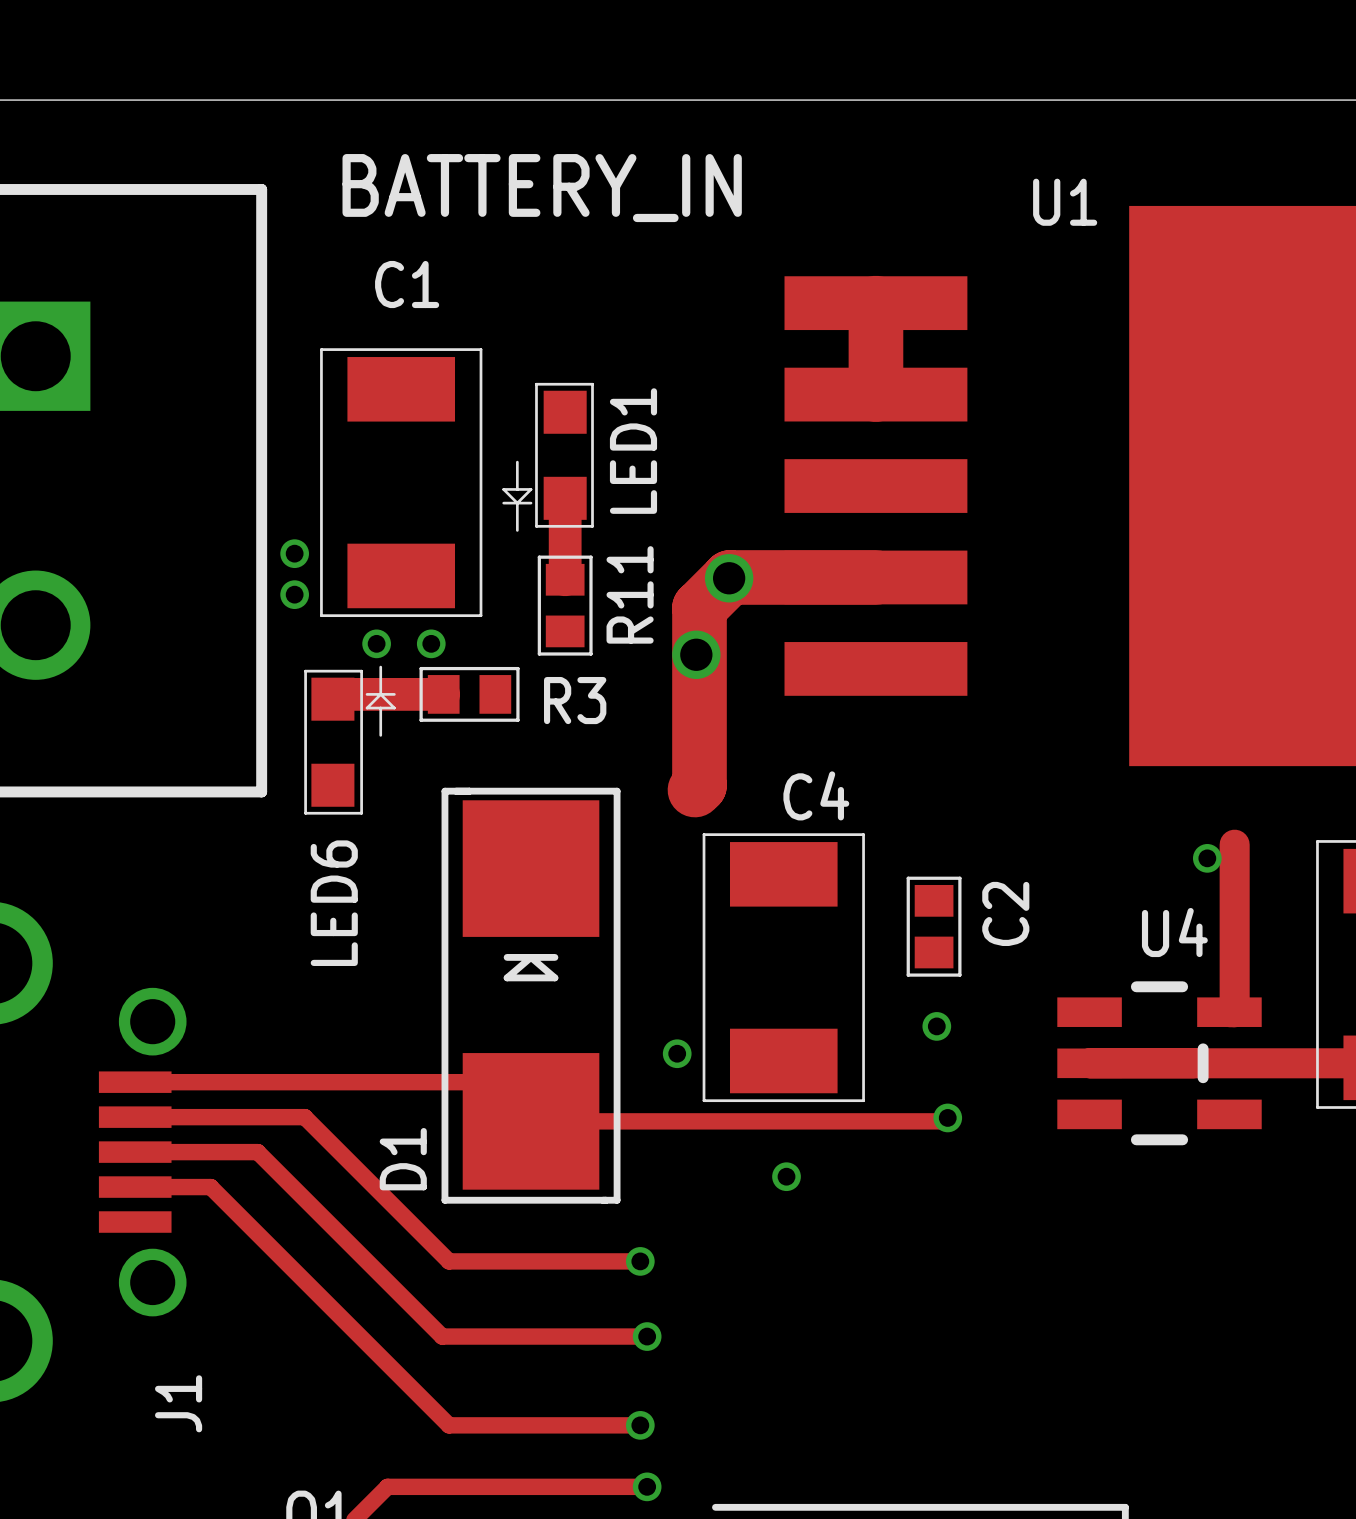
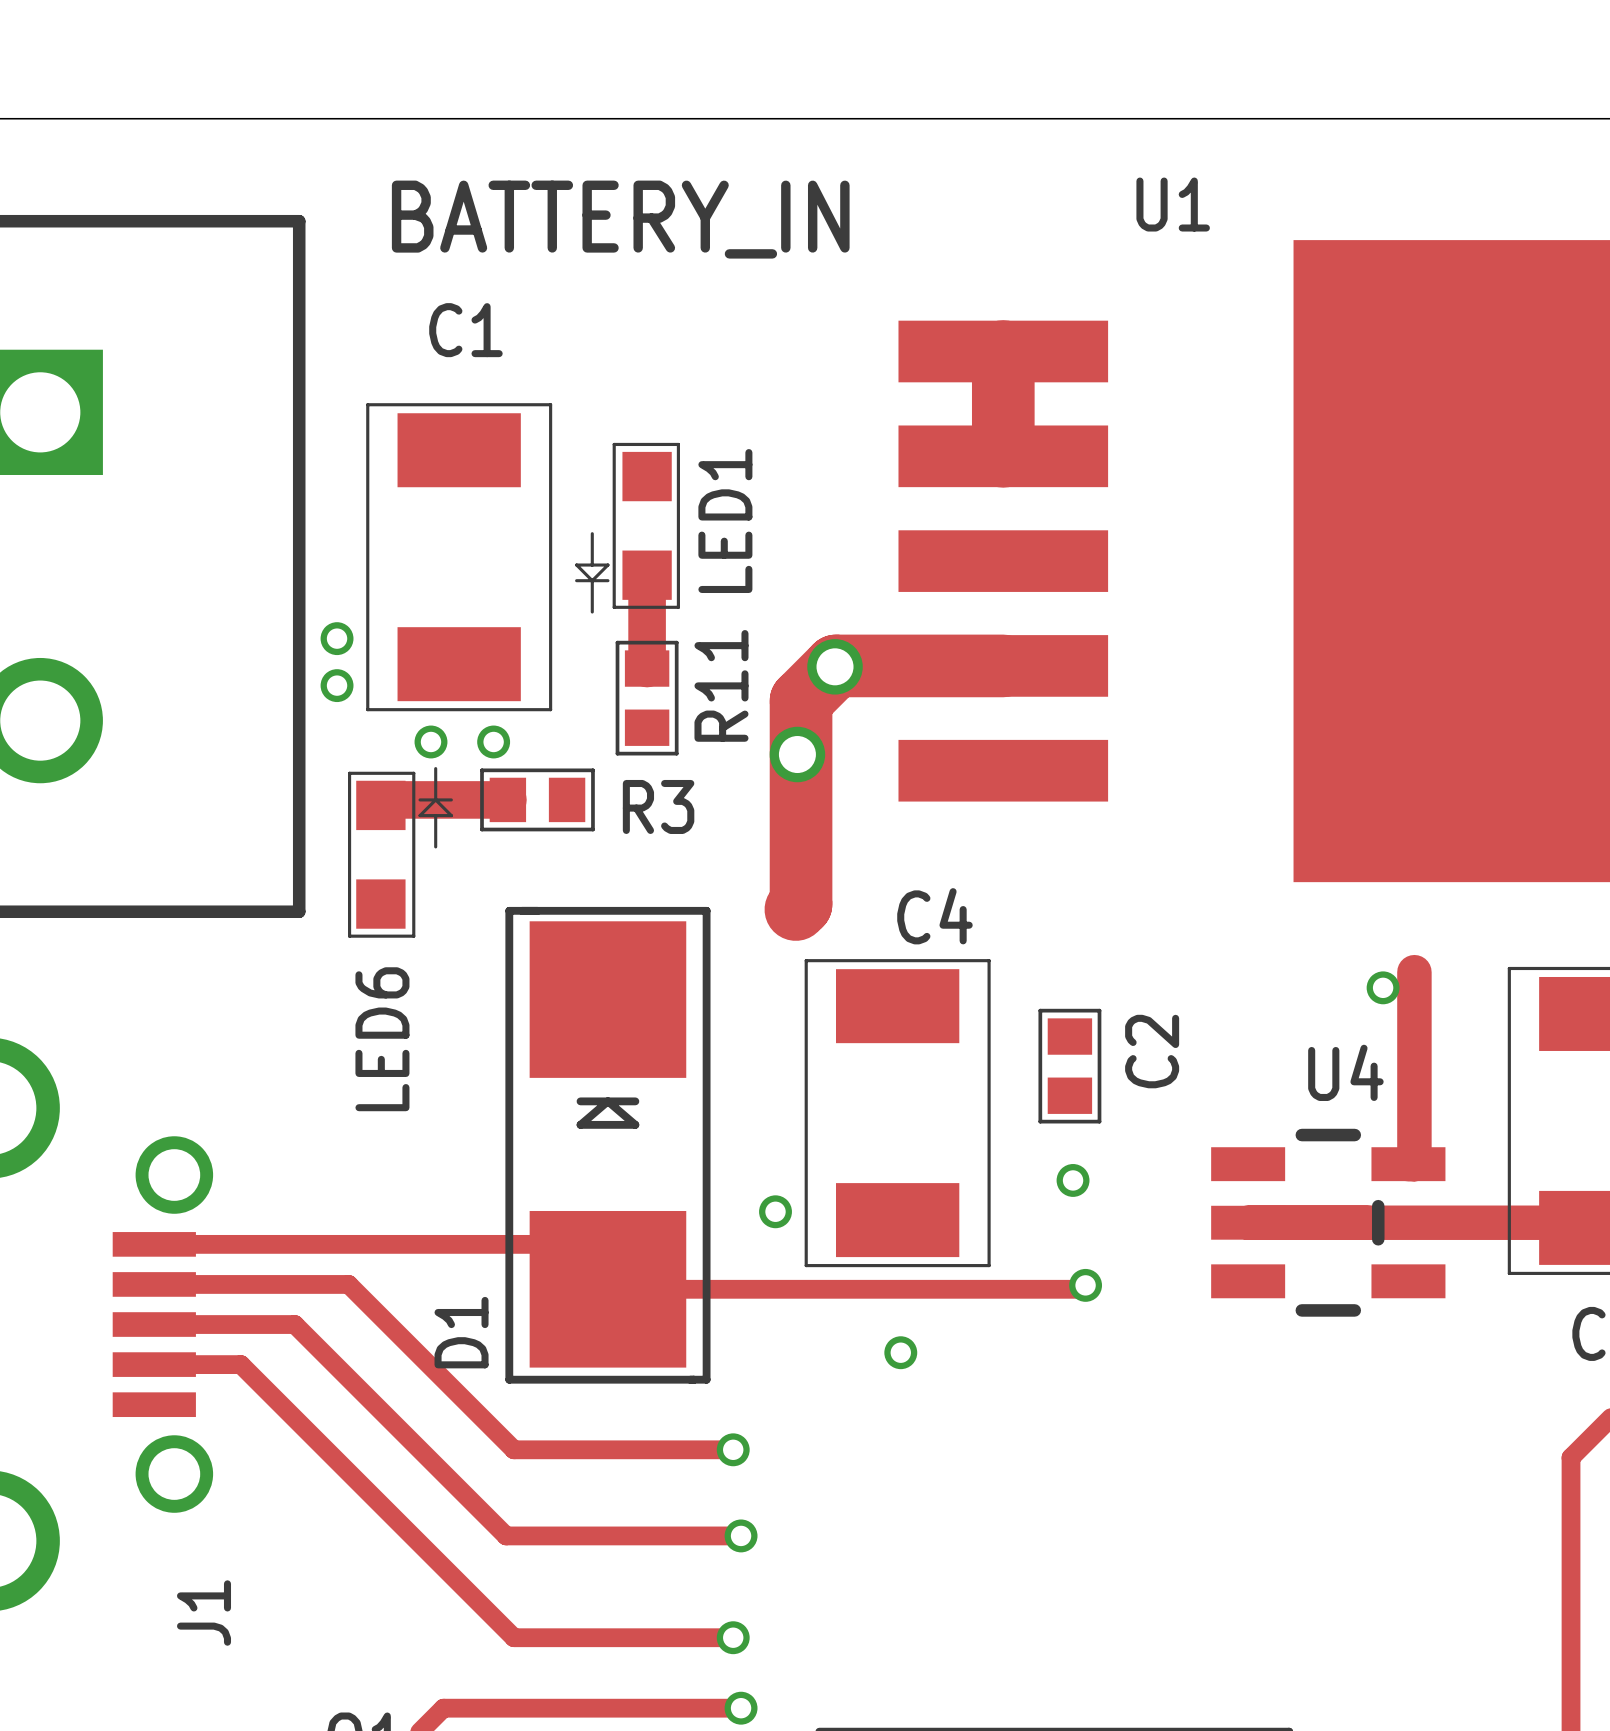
U1 name position: U1 (1065, 202) -> U1 (1173, 204)

